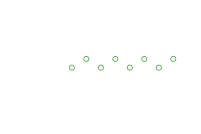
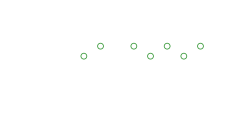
via: (100, 67) -> none

